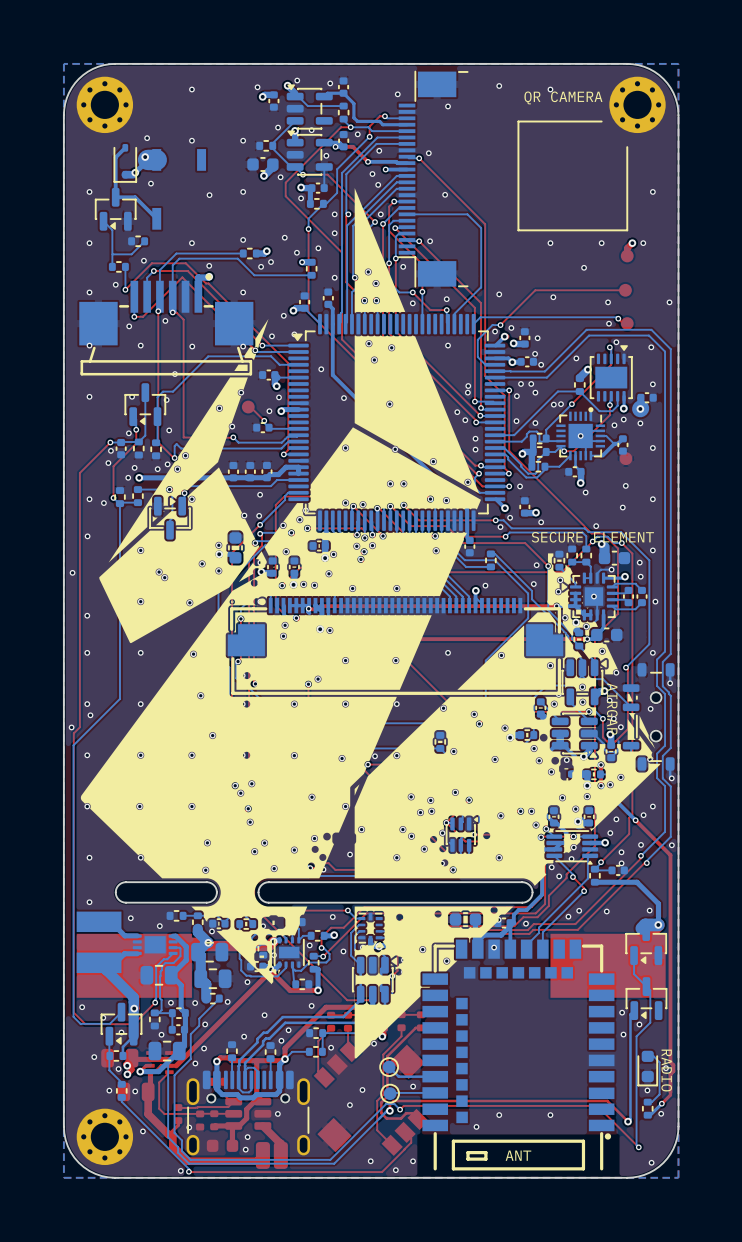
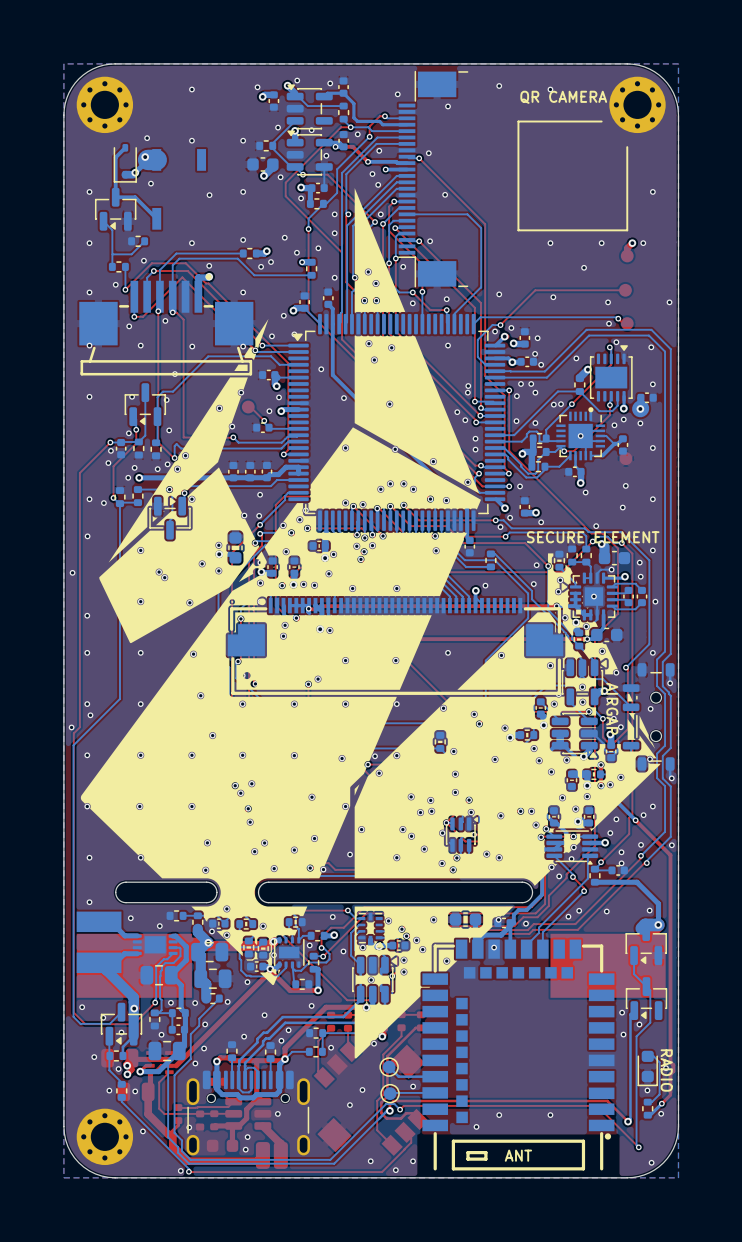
drawing shape: [308, 427, 481, 512] -> [308, 427, 481, 512]
drawing shape: [80, 503, 467, 985] -> [80, 503, 467, 966]
drawing shape: [354, 696, 661, 886] -> [354, 696, 661, 886]
drawing position: (566, 768) -> (571, 780)
drawing shape: [354, 906, 514, 1059] -> [354, 906, 514, 1059]
drawing position: (273, 922) -> (295, 922)
drawing: none -> [398, 943, 400, 948]
drawing: none -> [246, 946, 266, 969]
drawing: [259, 955, 265, 958] -> none
drawing shape: [278, 969, 281, 975] -> [260, 969, 281, 986]

